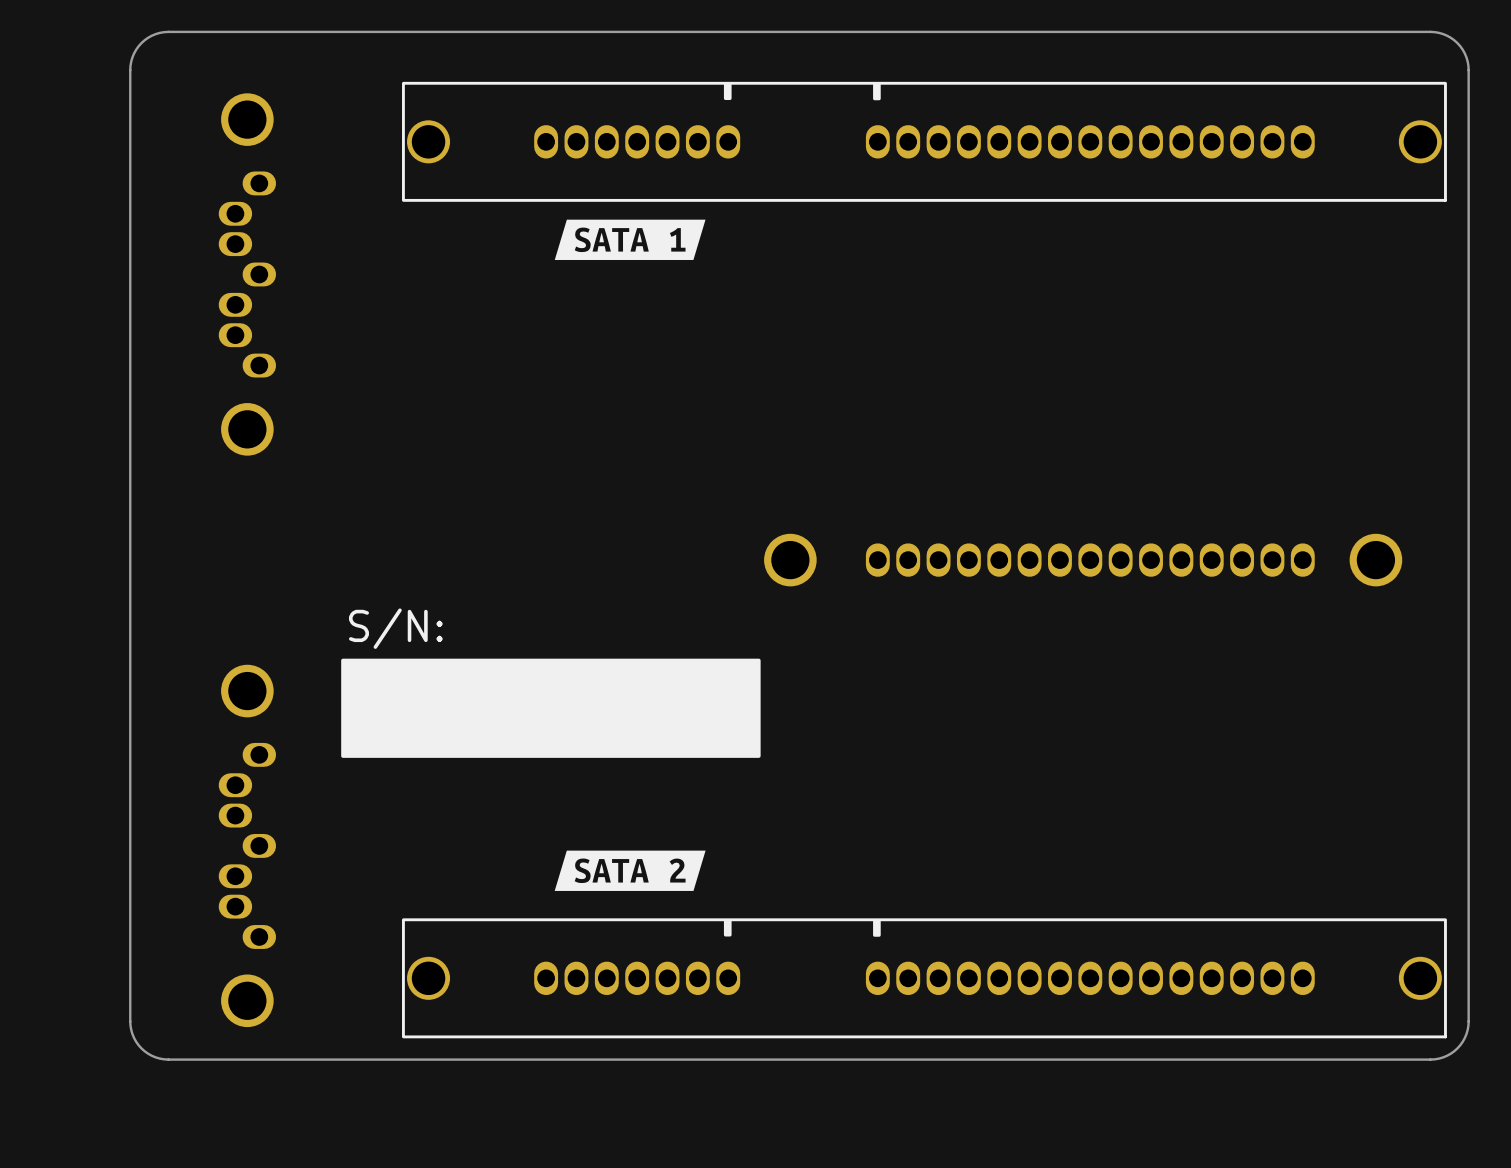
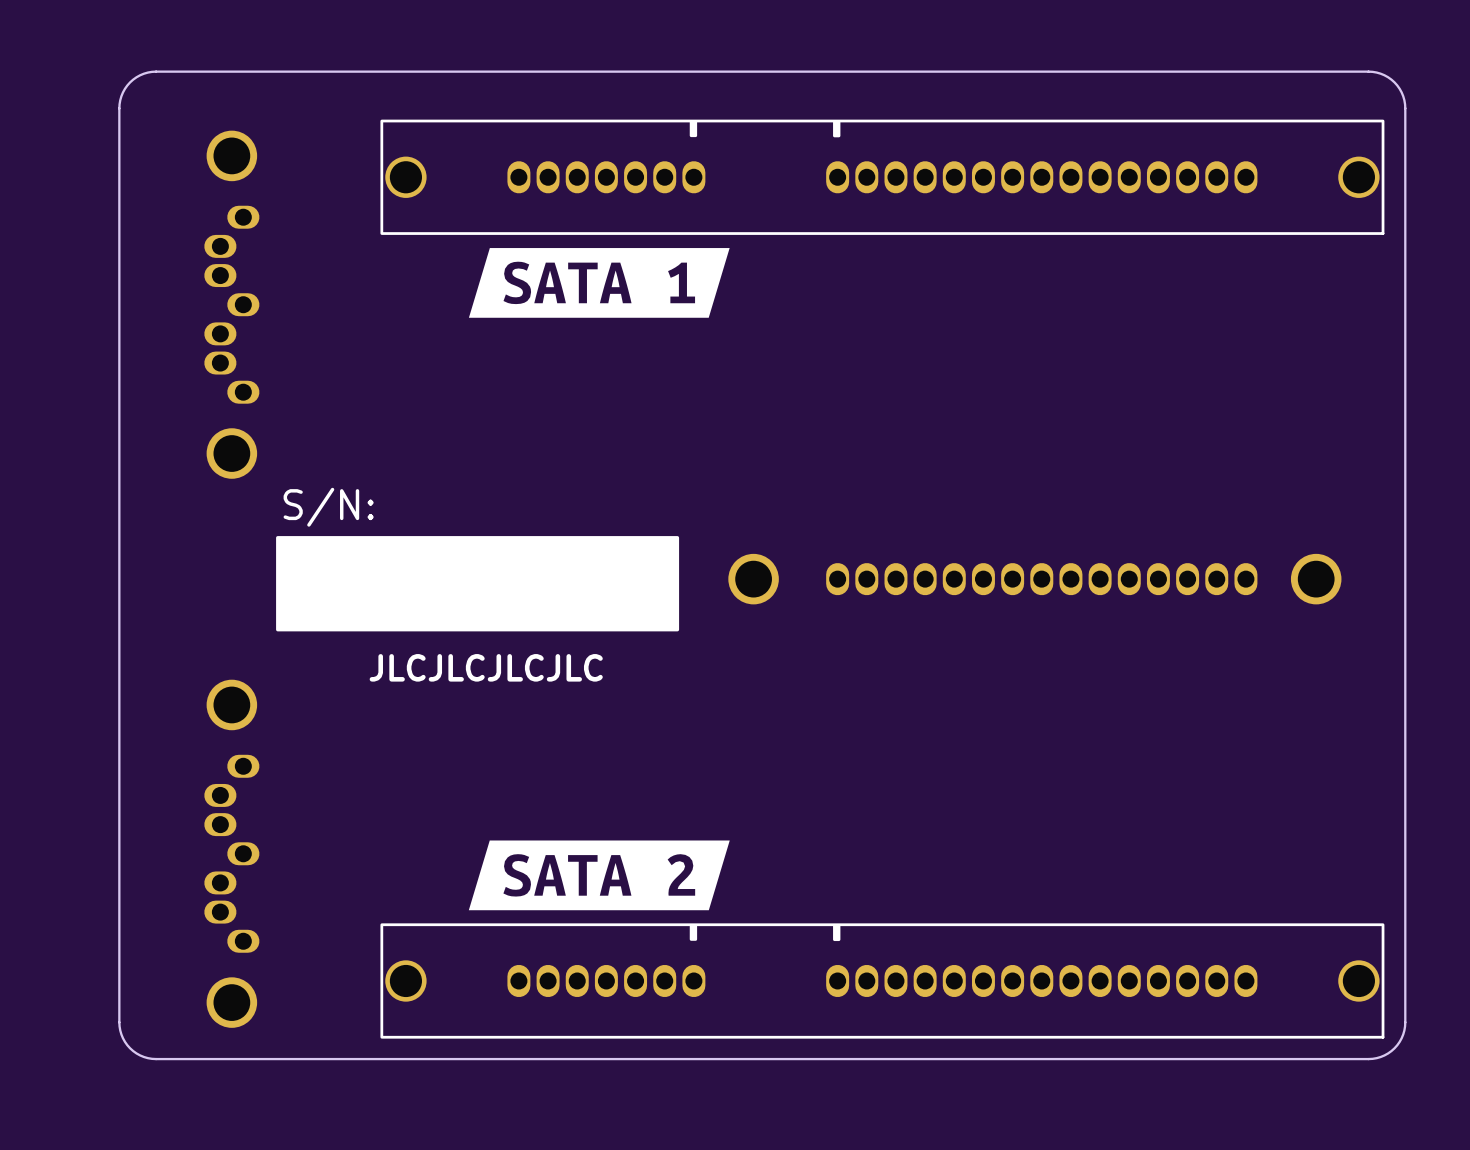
drawing shape: [554, 219, 706, 260] -> [468, 248, 730, 318]
text position: S/N: (395, 628) -> S/N: (328, 507)
text: none -> JLCJLCJLCJLC (486, 667)
drawing position: (550, 708) -> (477, 583)
drawing shape: [554, 850, 706, 891] -> [468, 840, 730, 911]

